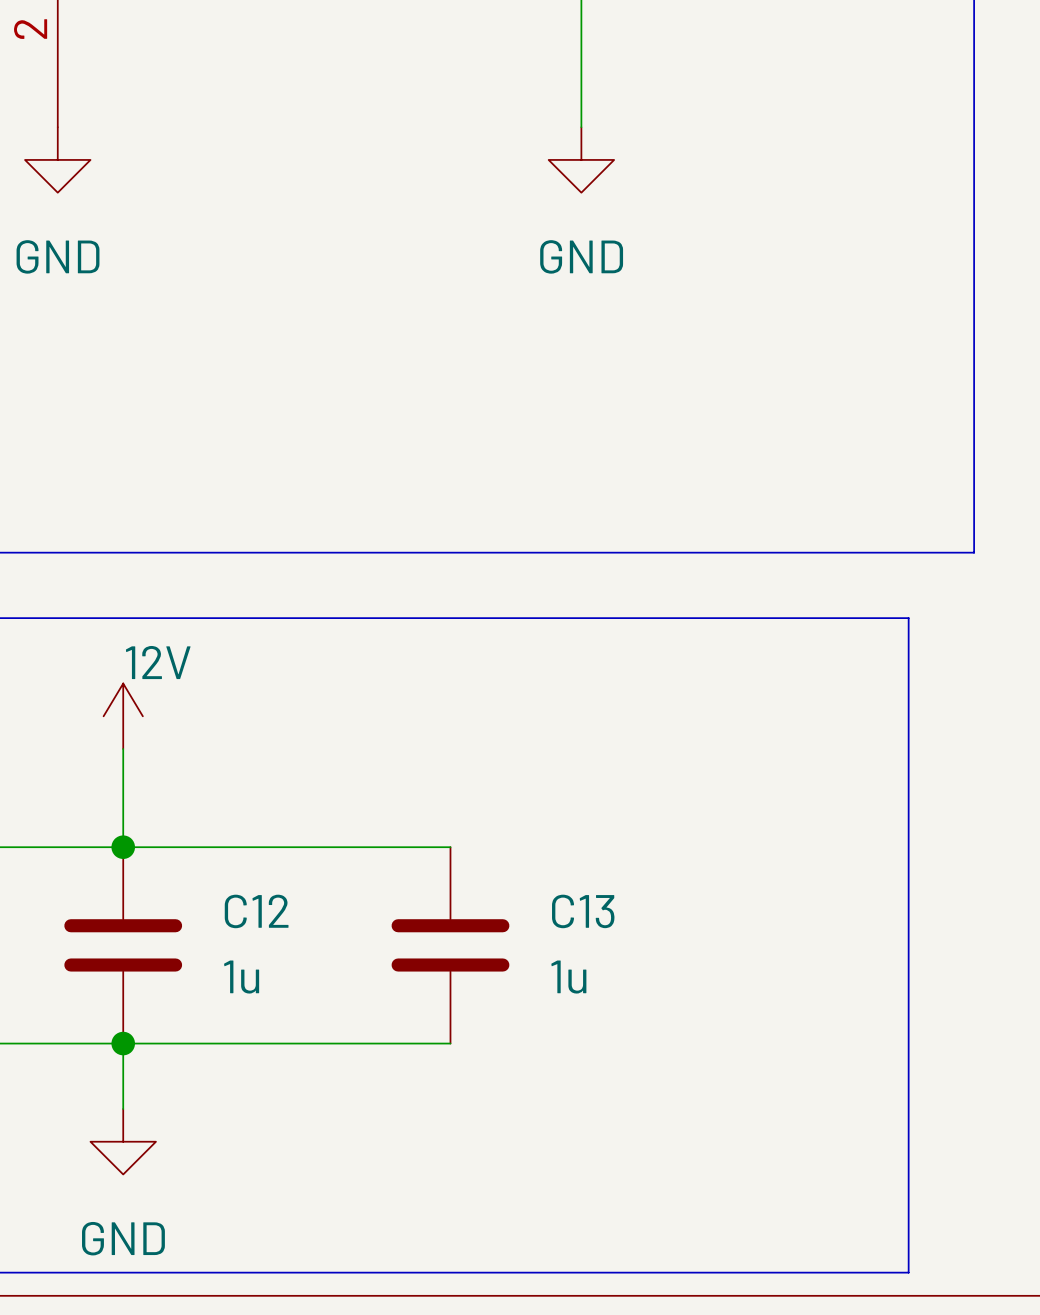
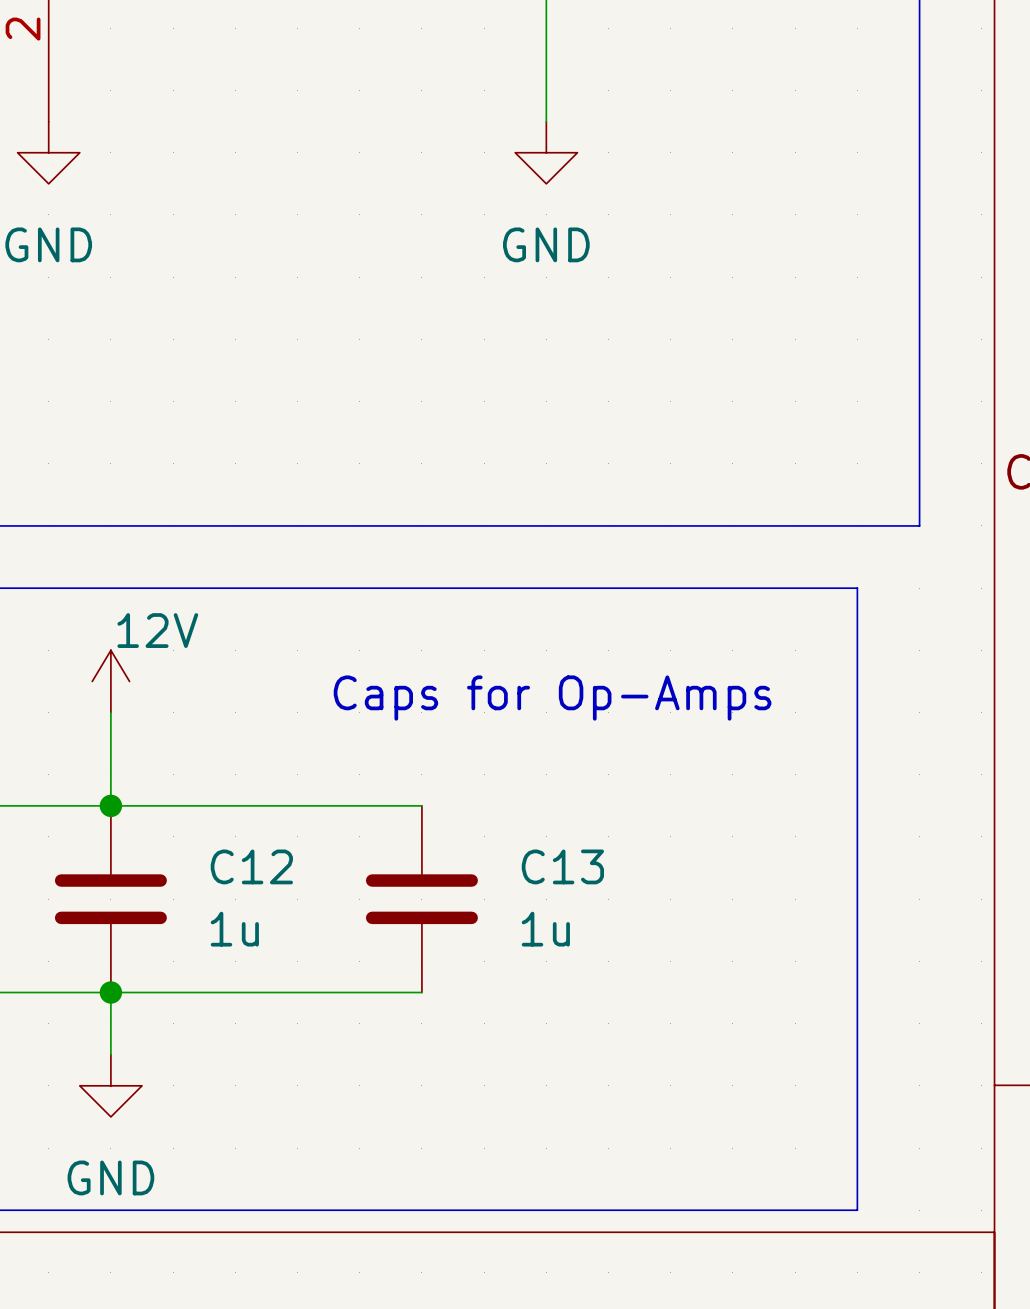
text: none -> Caps for Op-Amps (552, 698)

